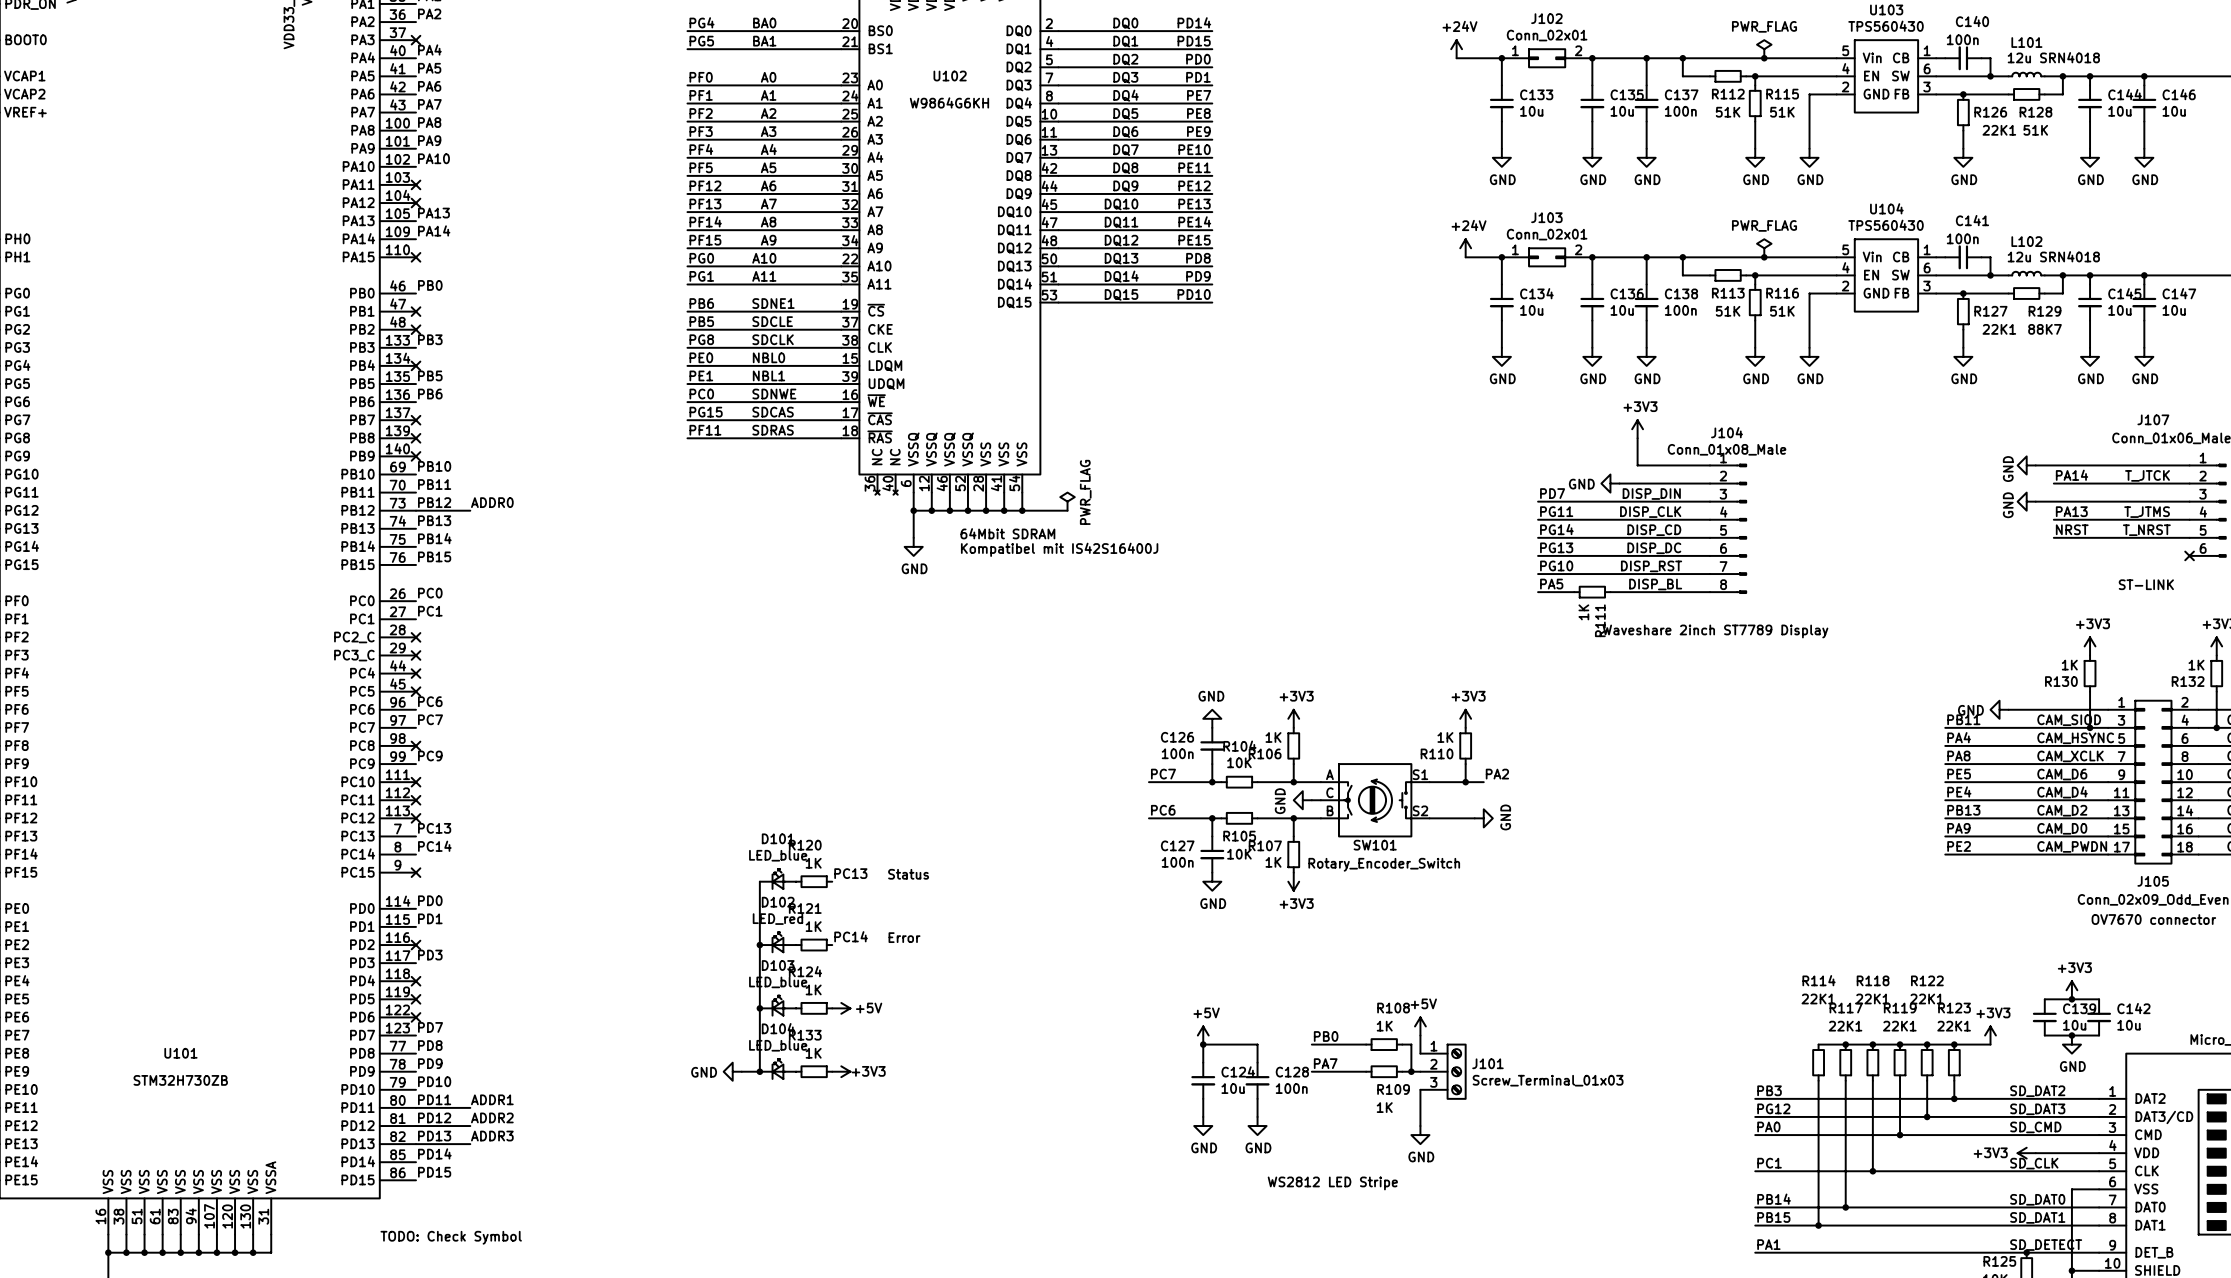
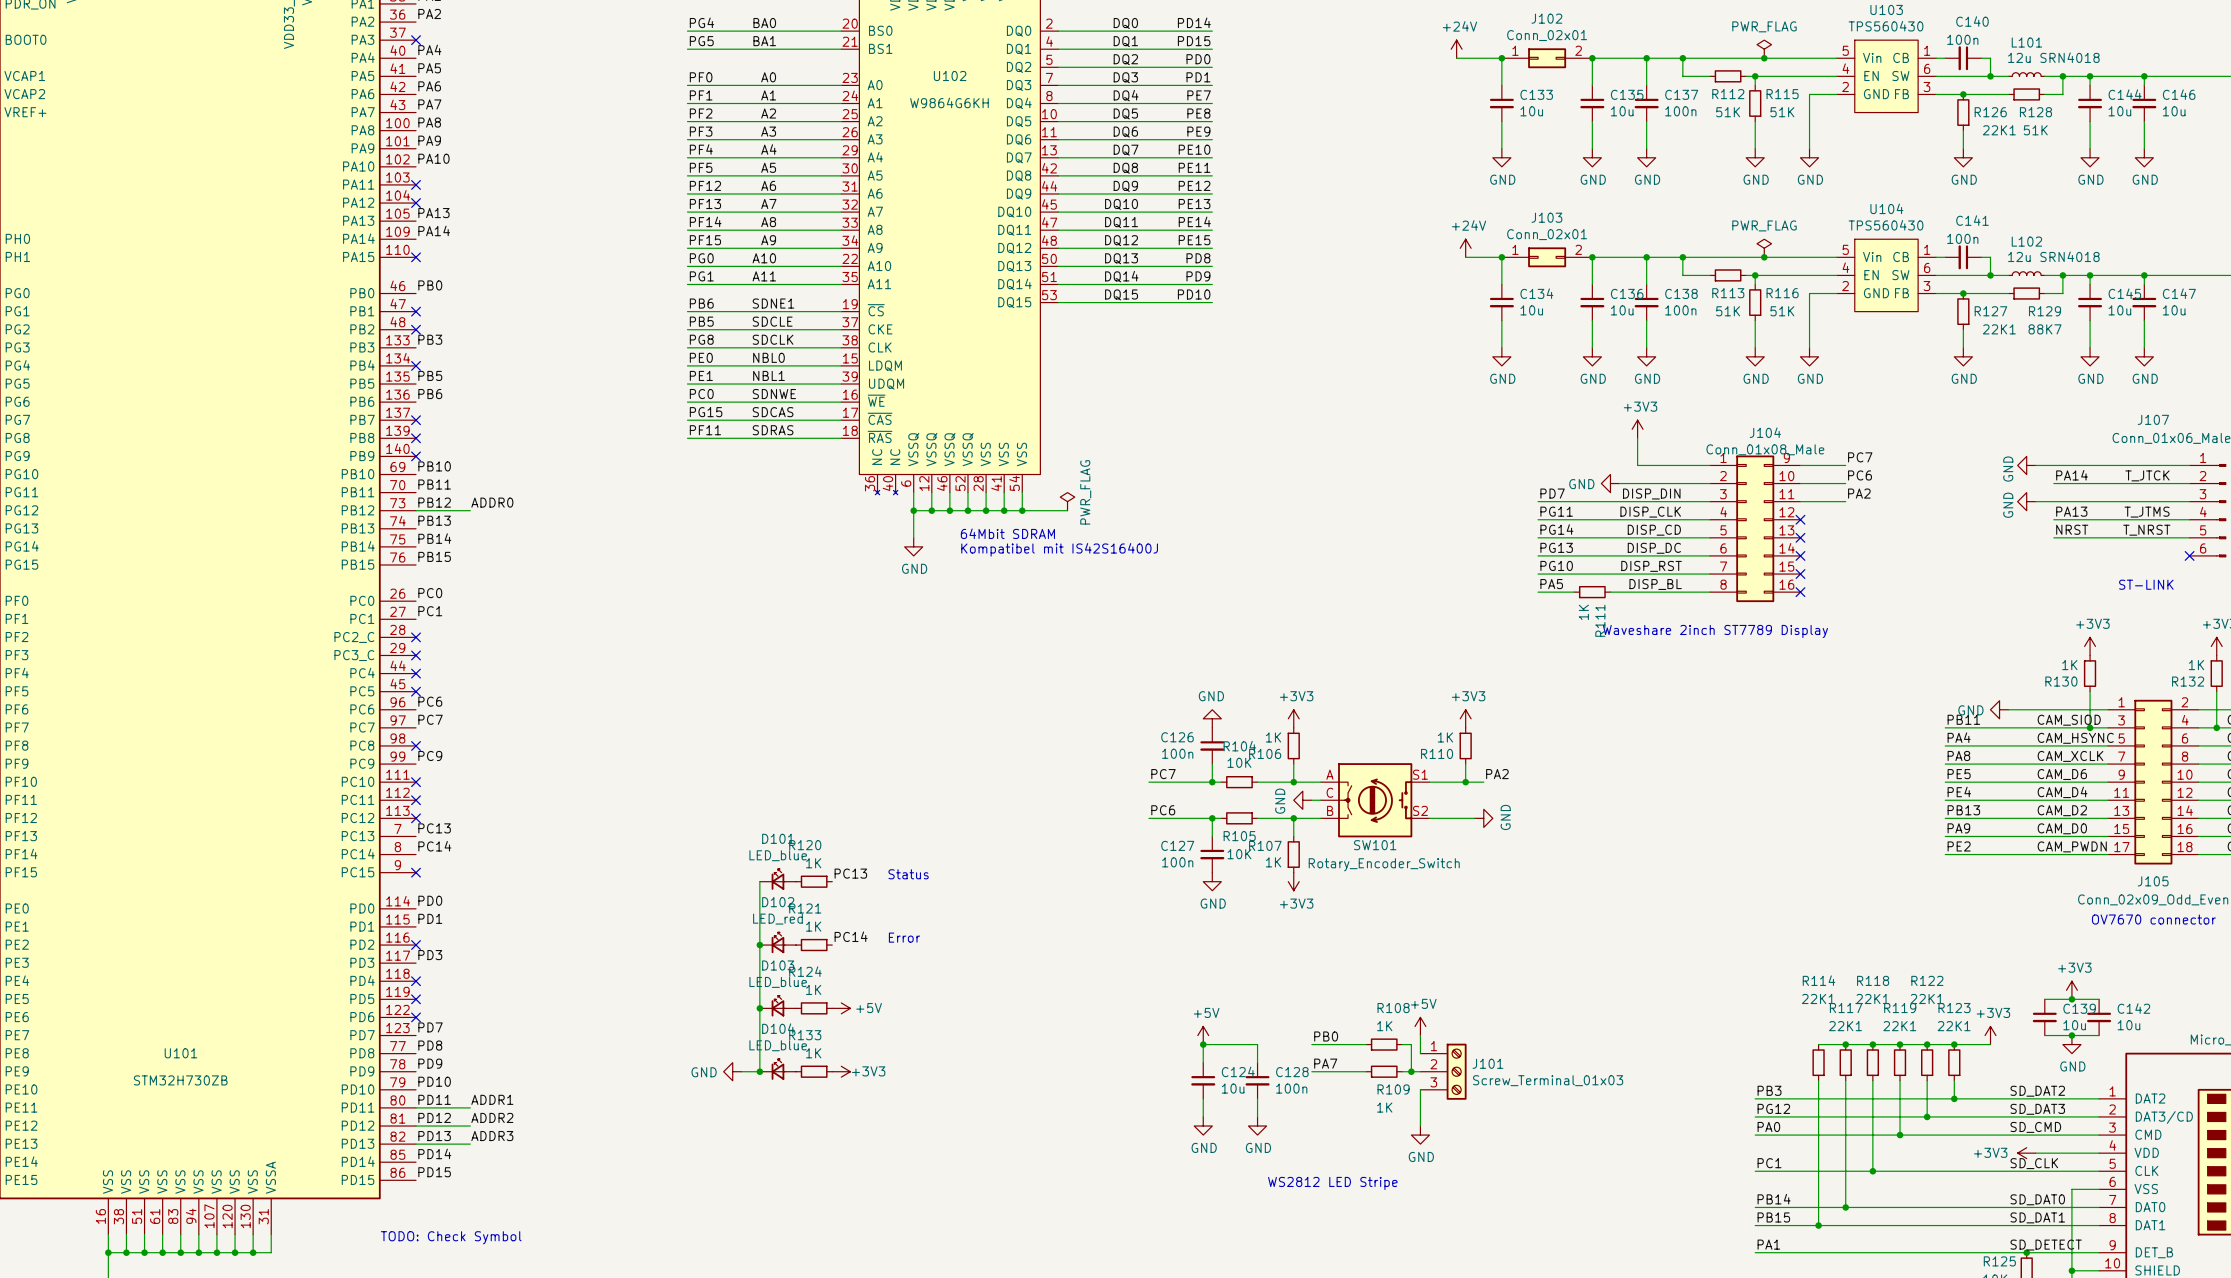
label: none -> PC7 (1860, 457)
J104 symbol: [1709, 464, 1747, 594] -> [1709, 455, 1801, 603]
wire: none -> (1800, 465) (1845, 465)
label: none -> PC6 (1860, 475)
wire: none -> (1800, 483) (1845, 483)
label: none -> PA2 (1859, 493)
wire: none -> (1800, 501) (1845, 501)
no-connect mark: none -> (1800, 519)
no-connect mark: none -> (1800, 537)
no-connect mark: none -> (1800, 555)
no-connect mark: none -> (1800, 574)
no-connect mark: none -> (1800, 592)

